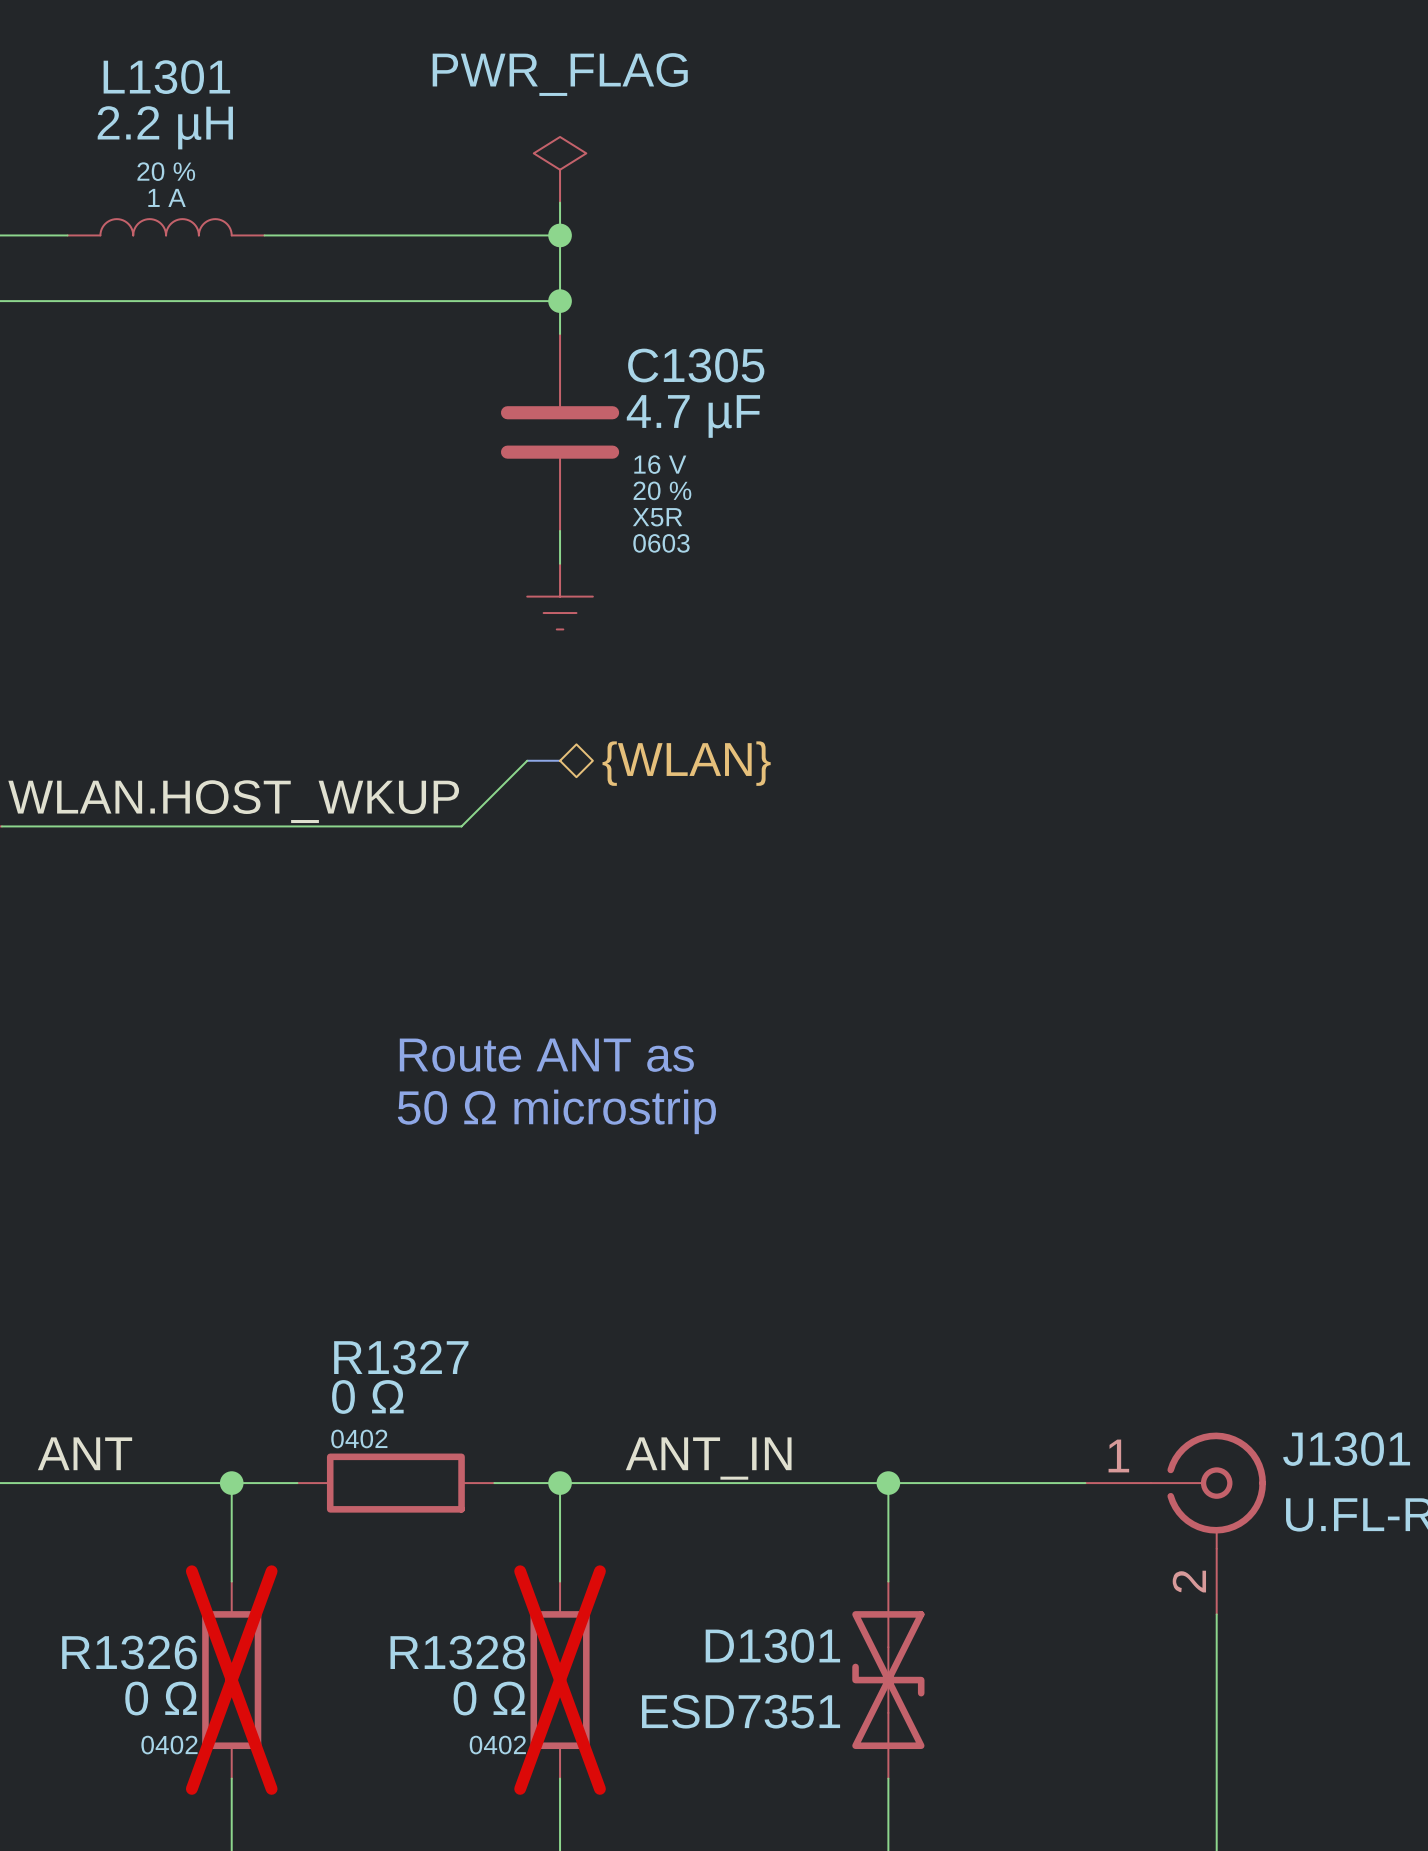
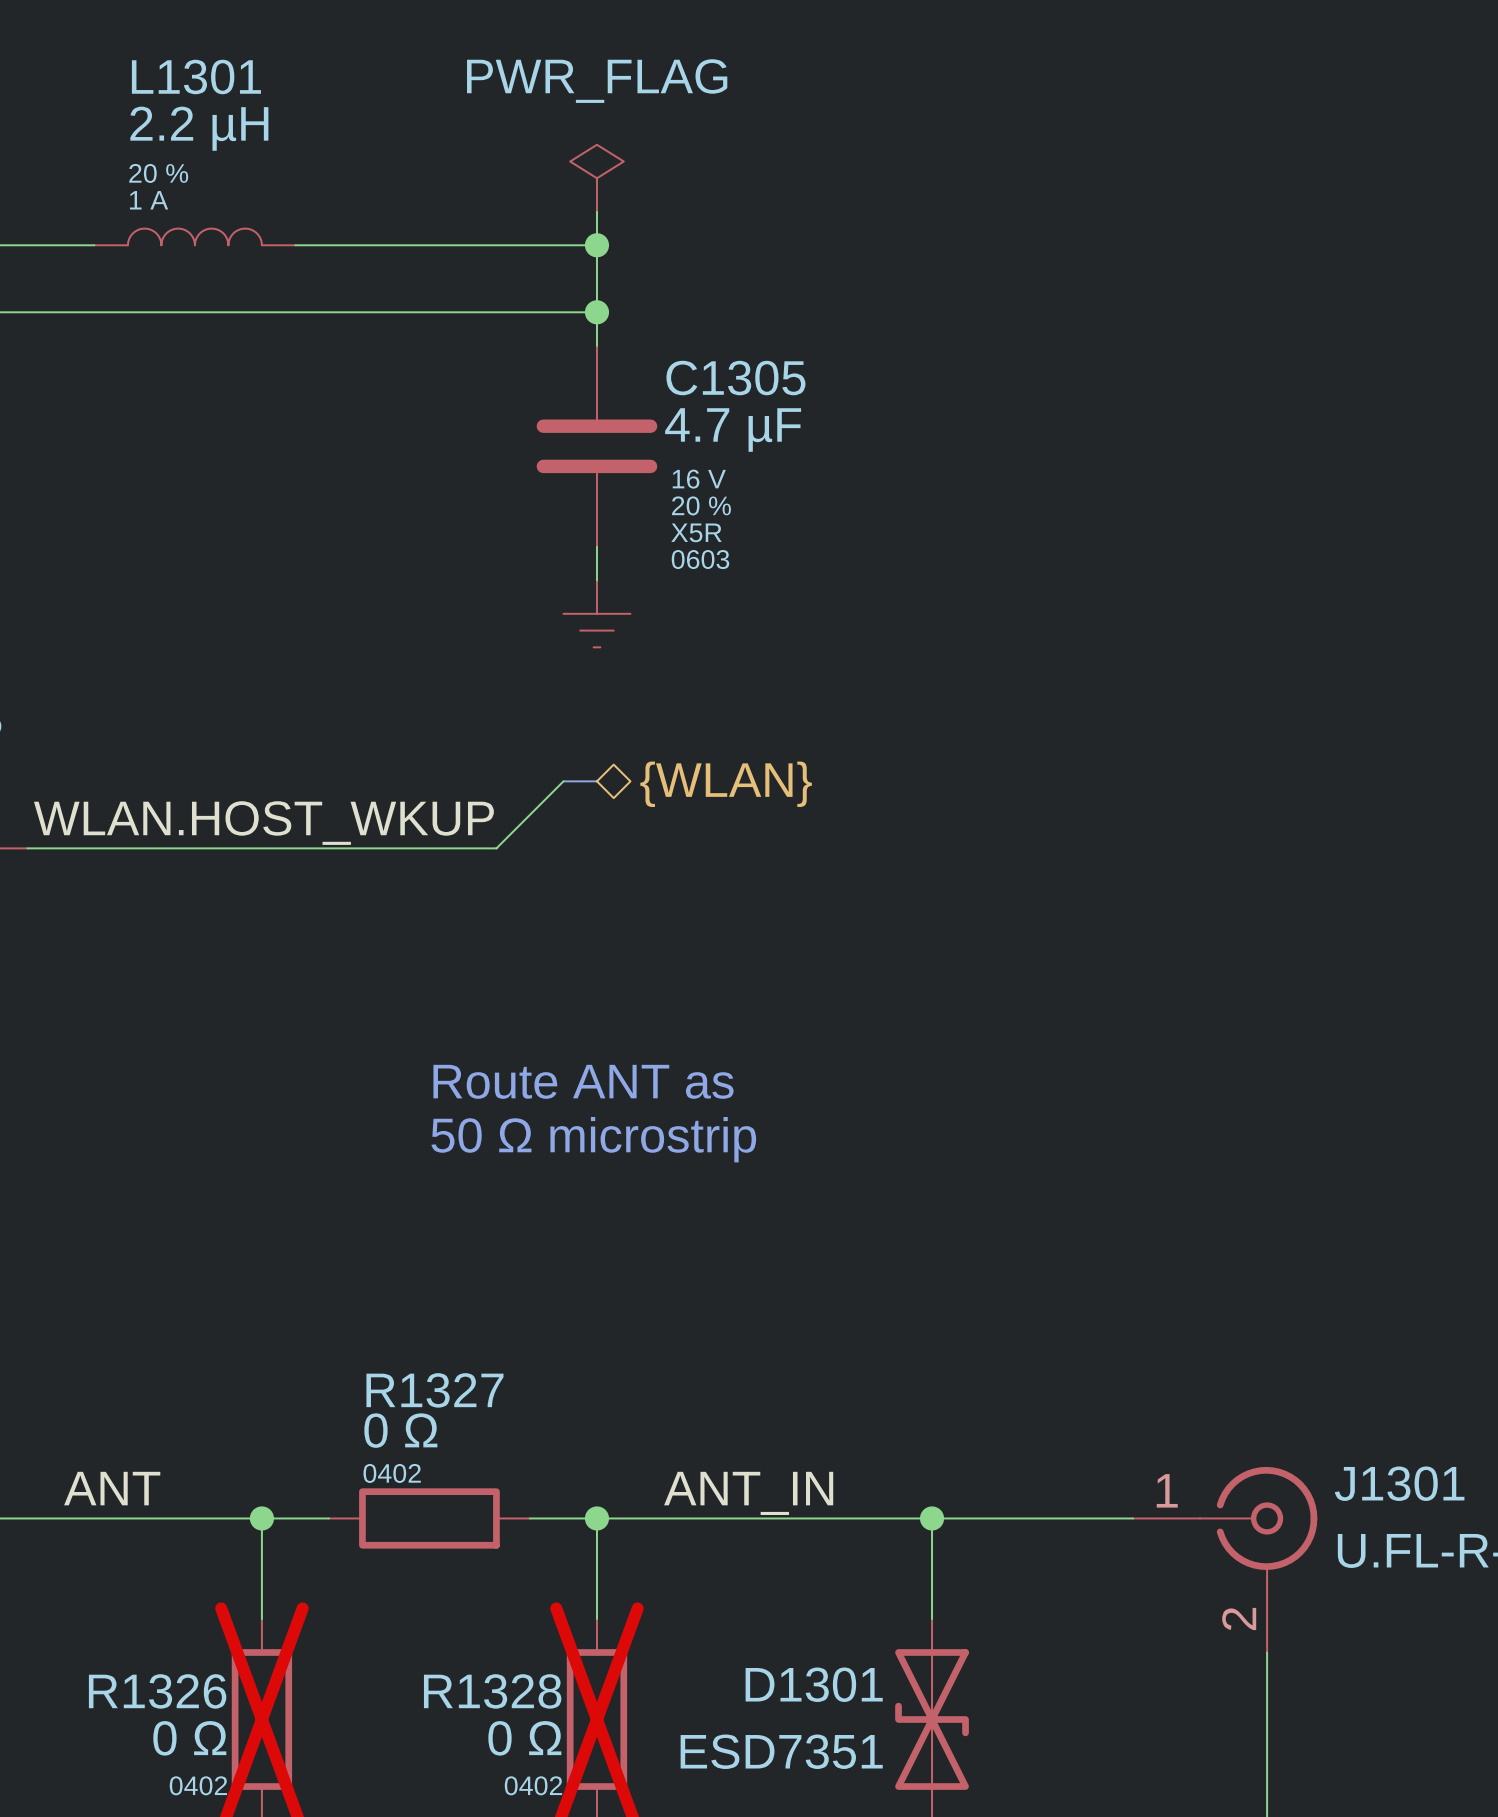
L1301 name position: L1301 (166, 77) -> L1301 (196, 76)
L1301 value position: 2.2 µH (165, 127) -> 2.2 µH (199, 128)
L1301 text position: 20 % (166, 171) -> 20 % (158, 173)
L1301 text position: 1 A (167, 197) -> 1 A (149, 200)

